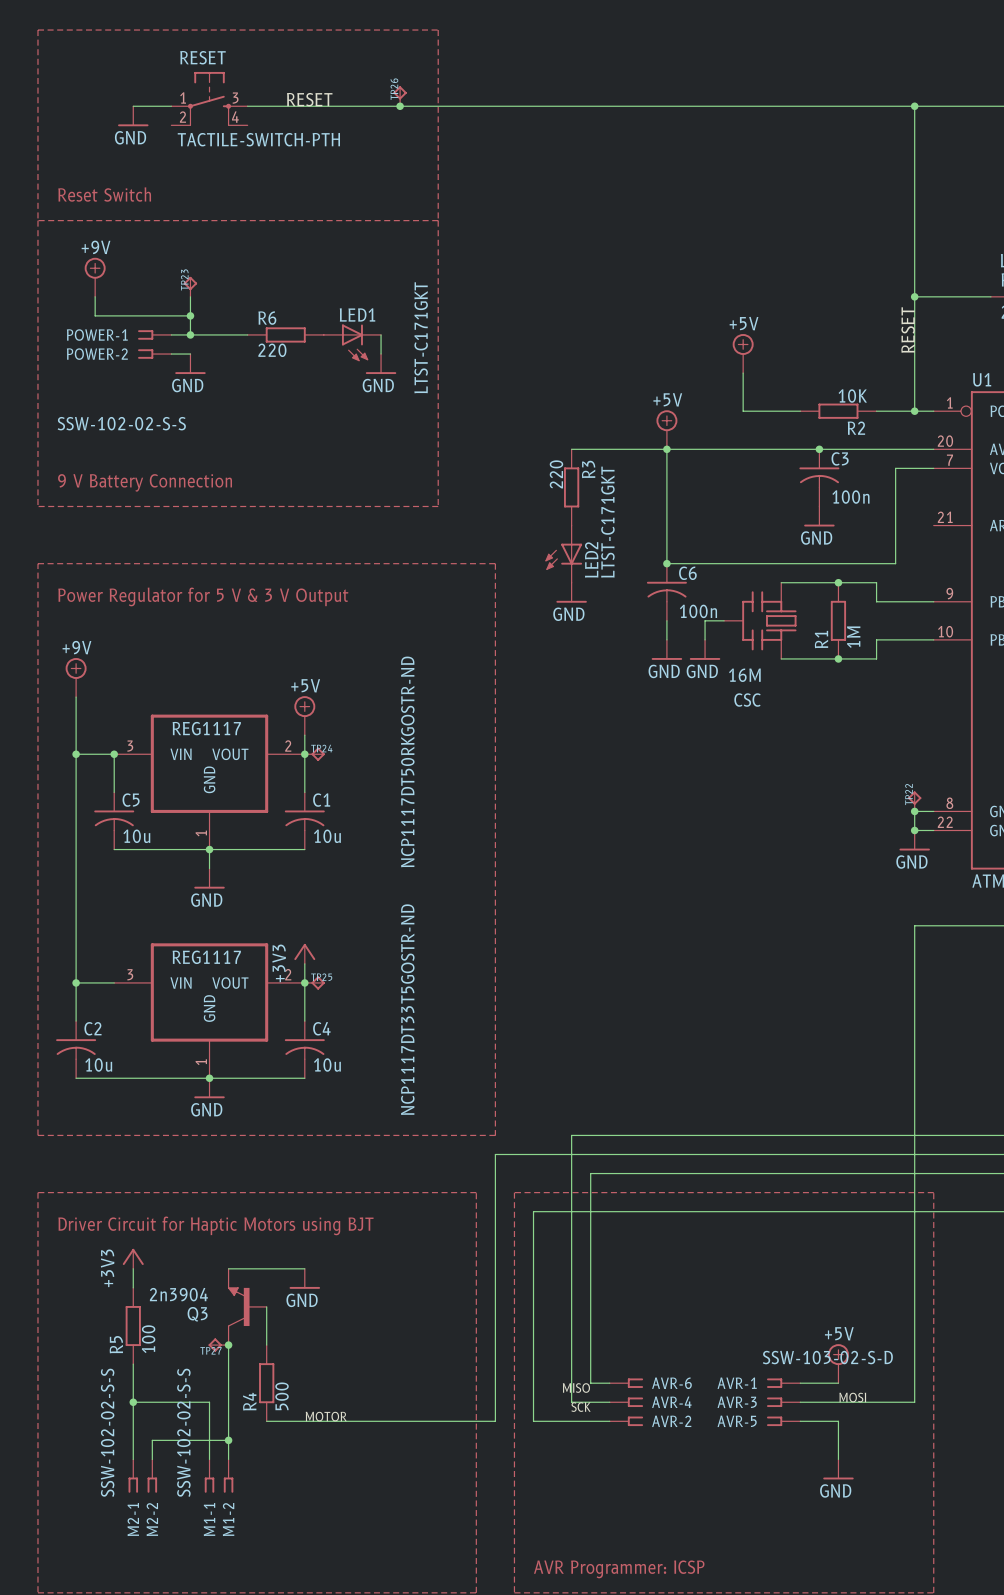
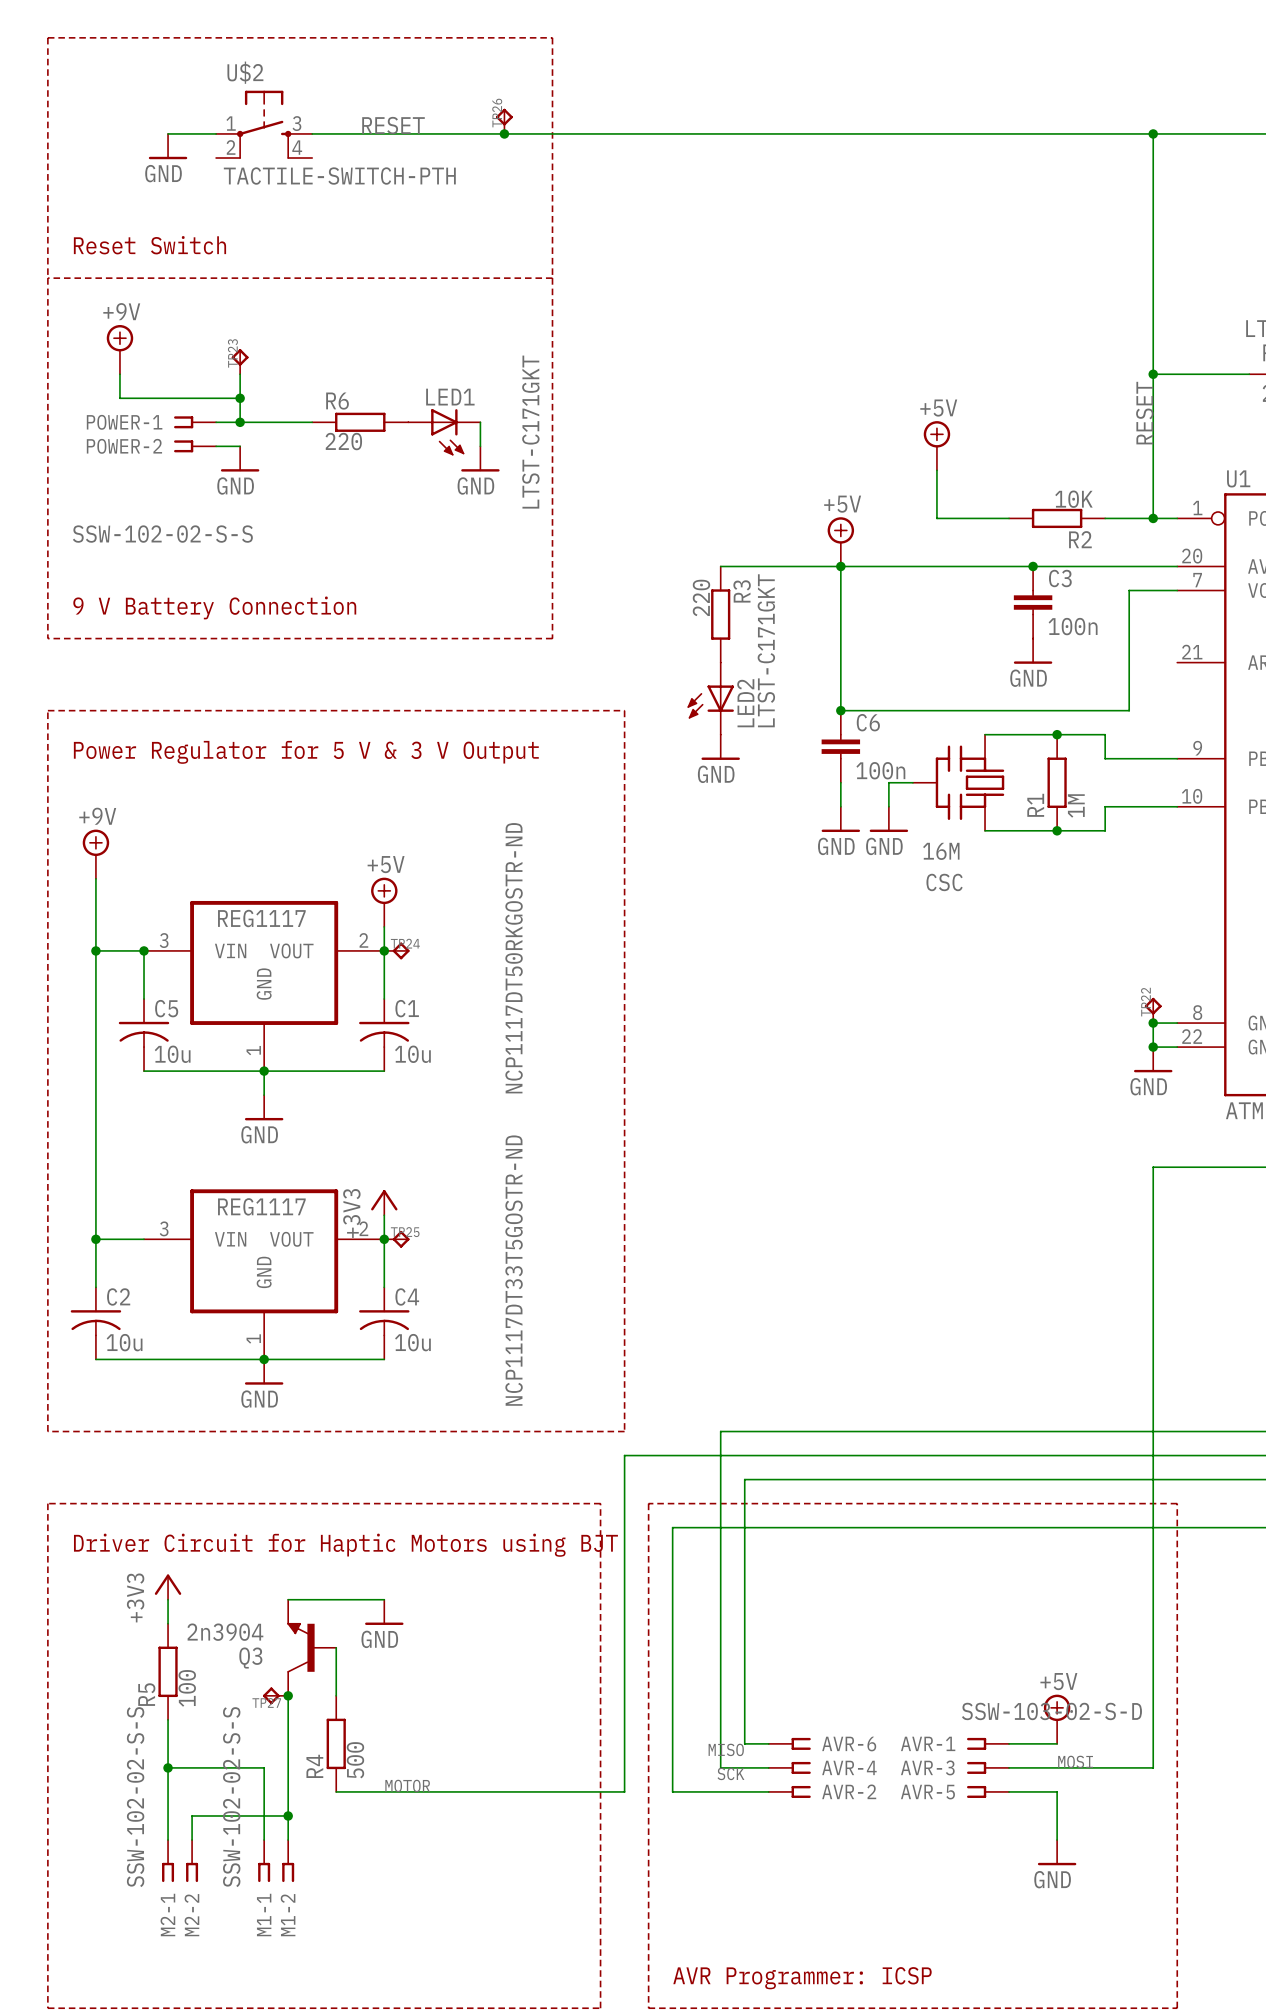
RESET name: RESET (202, 57) -> U$2 (245, 72)
C3 symbol: [799, 449, 840, 507] -> [1013, 566, 1053, 639]
C6 symbol: [646, 563, 687, 621] -> [821, 710, 861, 783]

